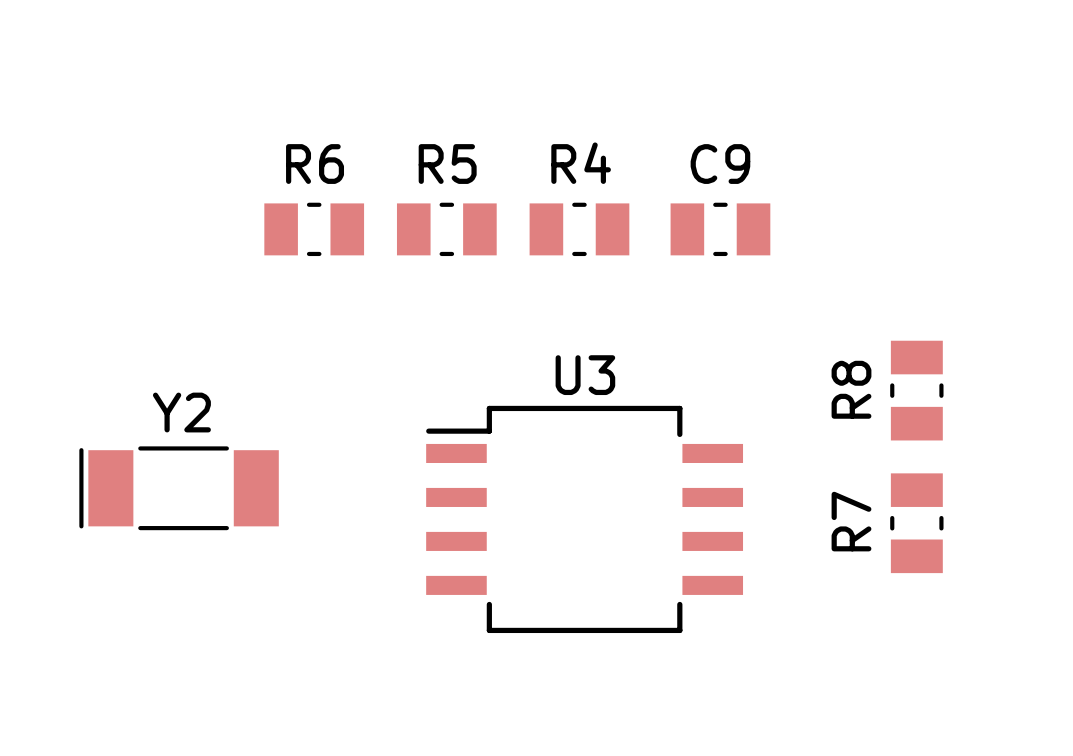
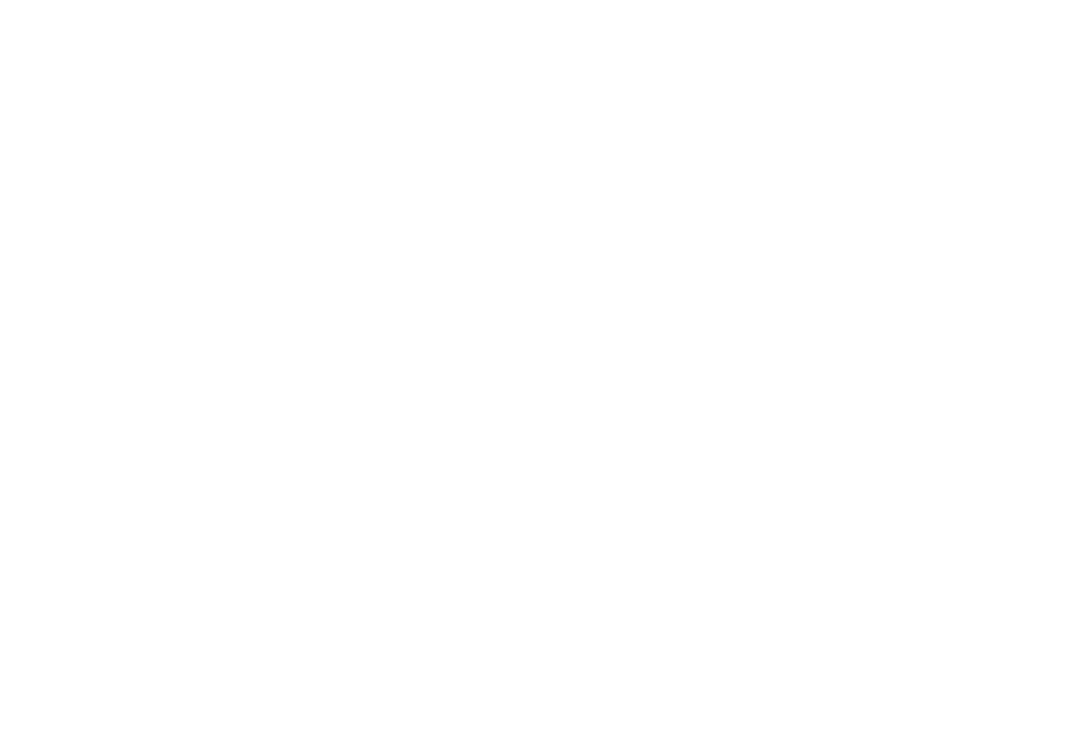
R6: (314, 229) -> none
R5: (446, 229) -> none
R4: (579, 229) -> none
C9: (720, 229) -> none
R8: (916, 390) -> none
Y2: (179, 488) -> none
U3: (584, 519) -> none
R7: (916, 523) -> none

